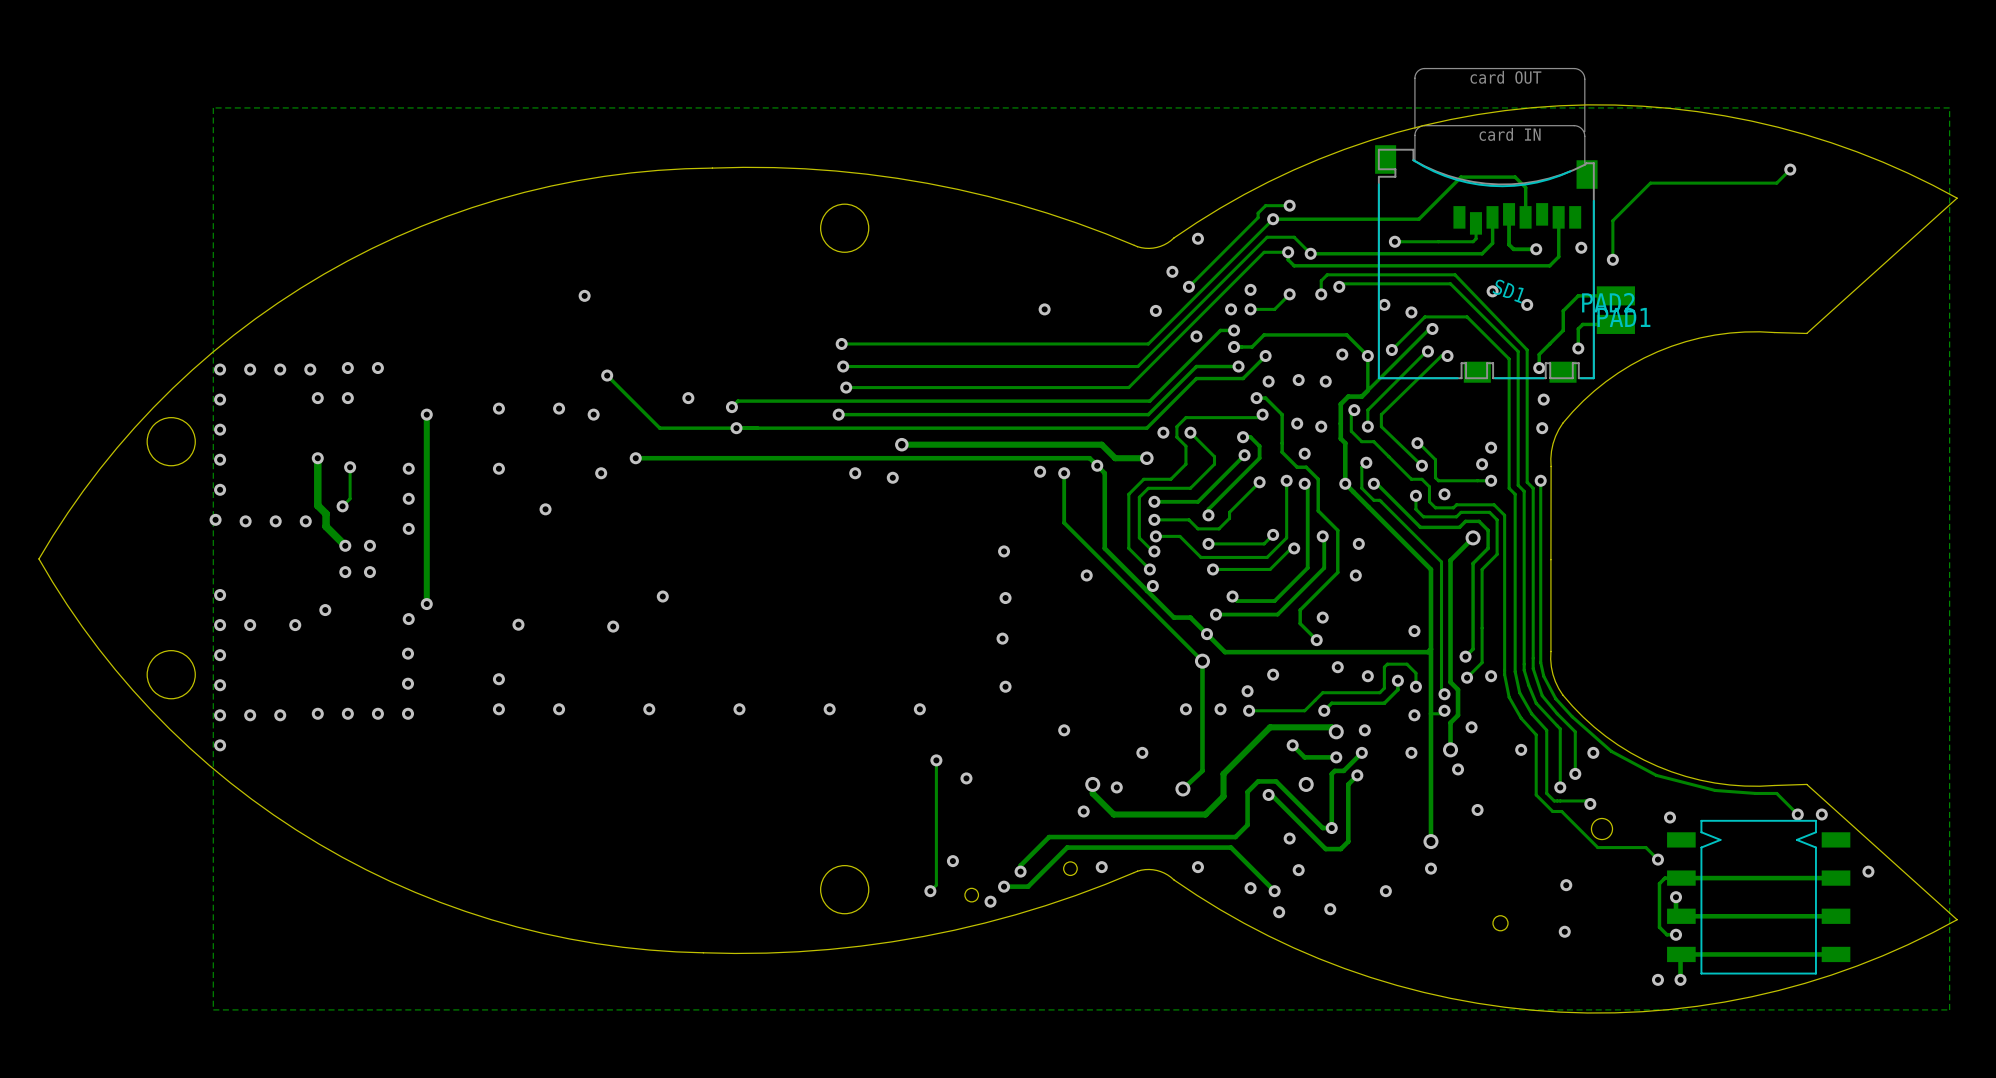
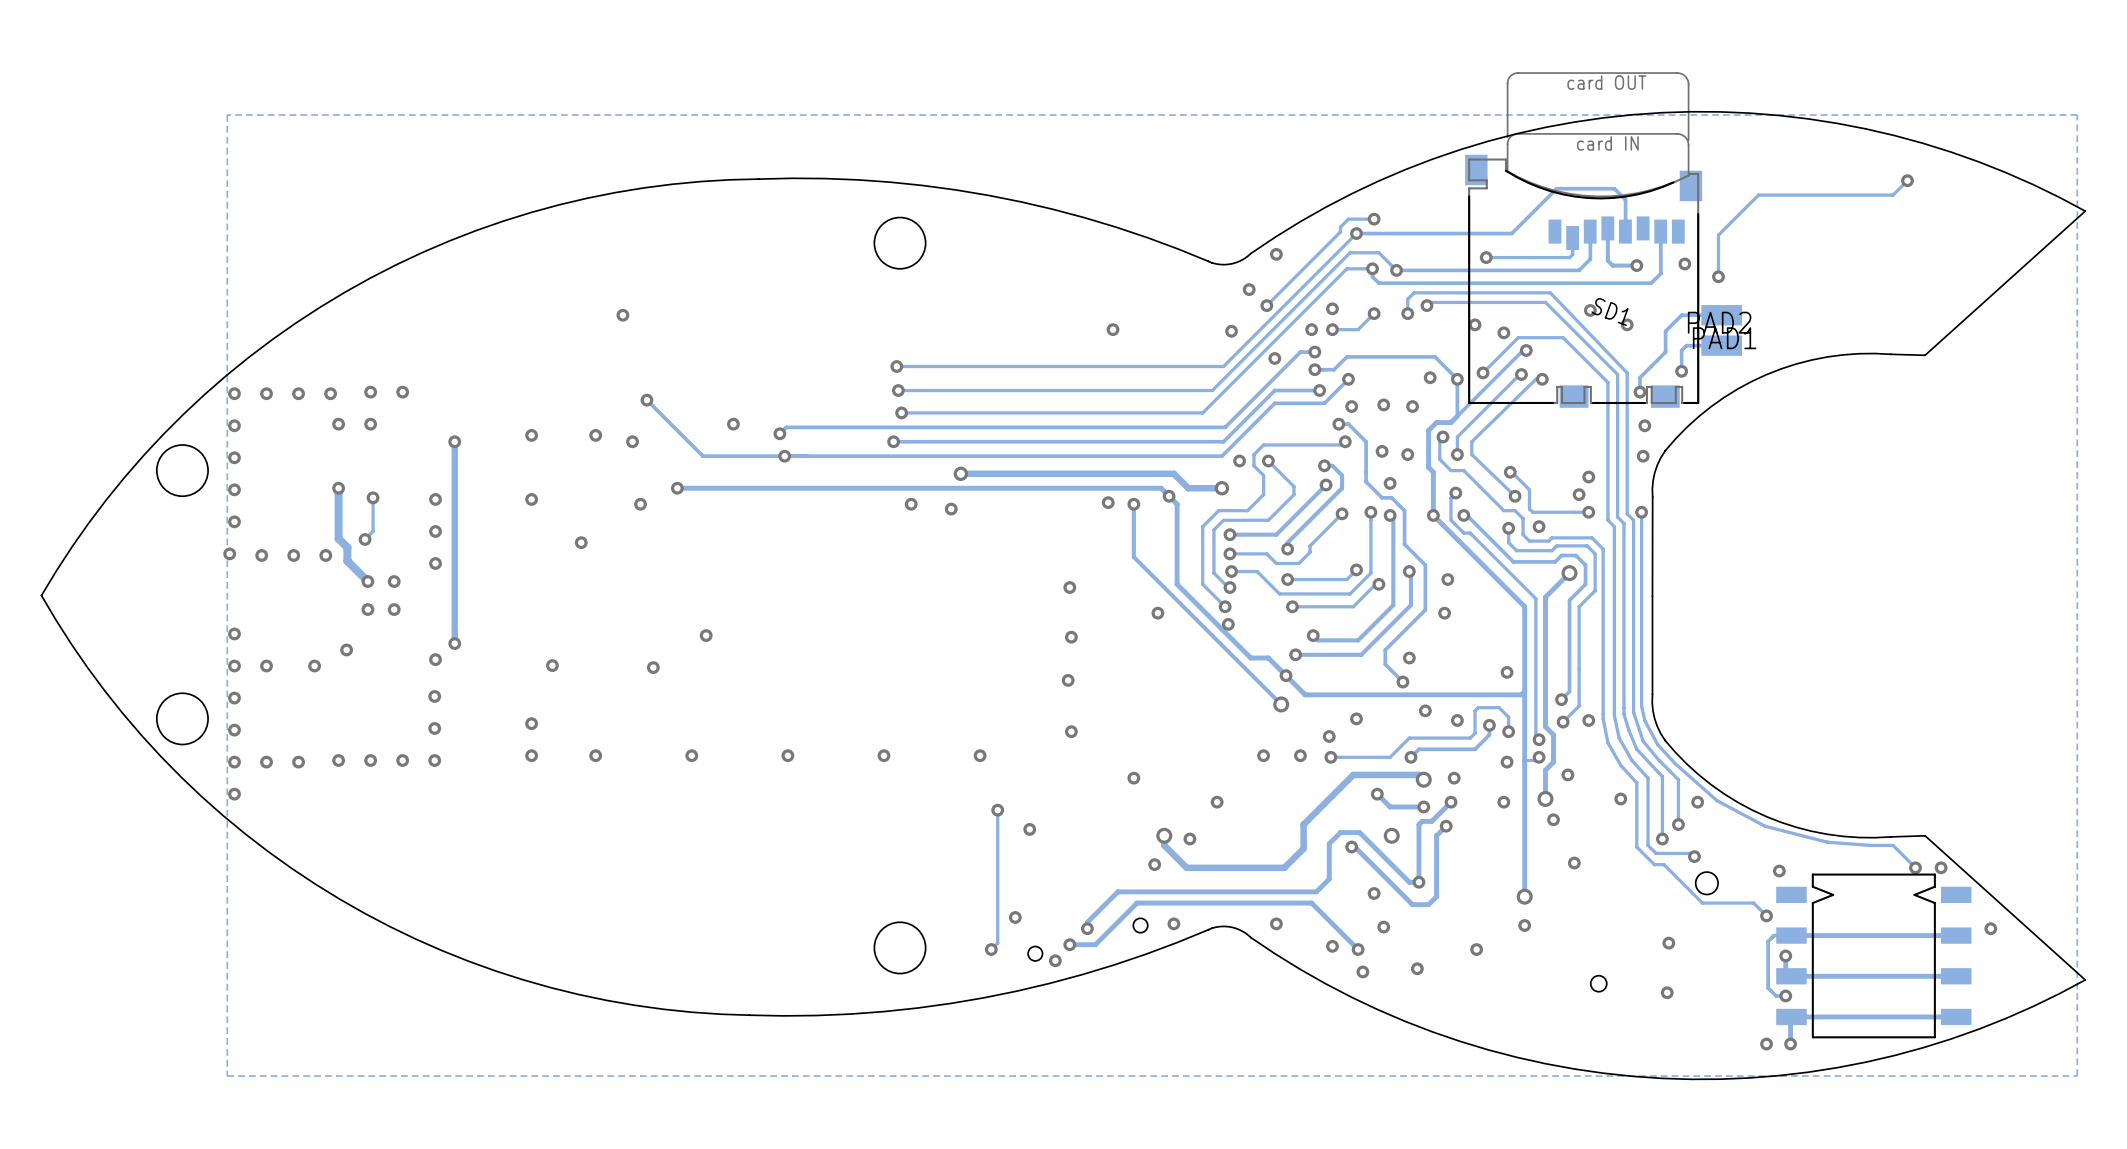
track: (1202, 661) (1202, 770) (1182, 788) -> none
via: (1182, 788) -> none

